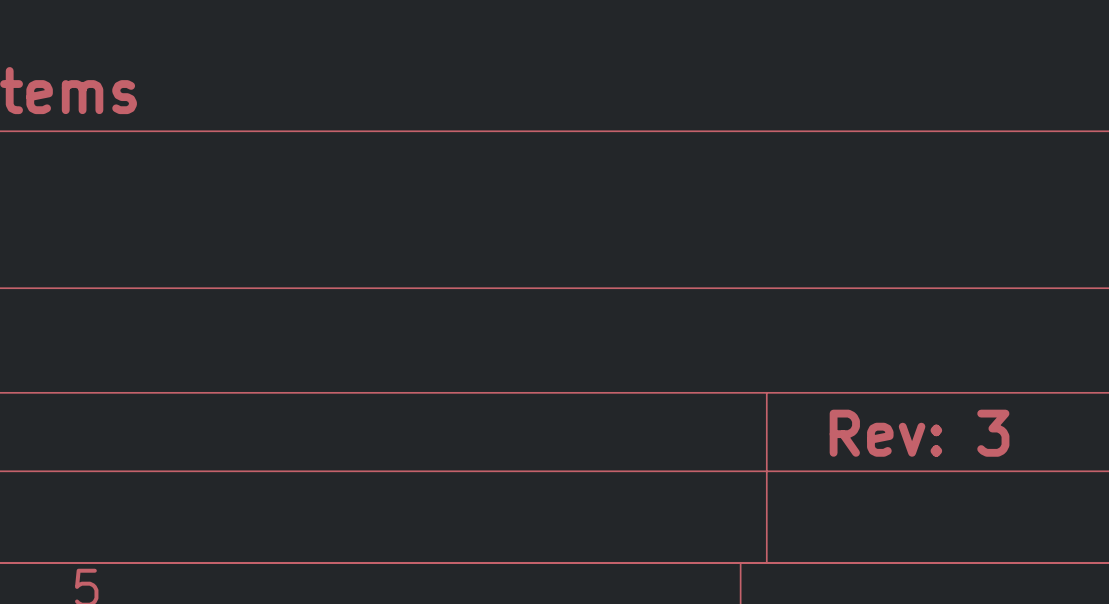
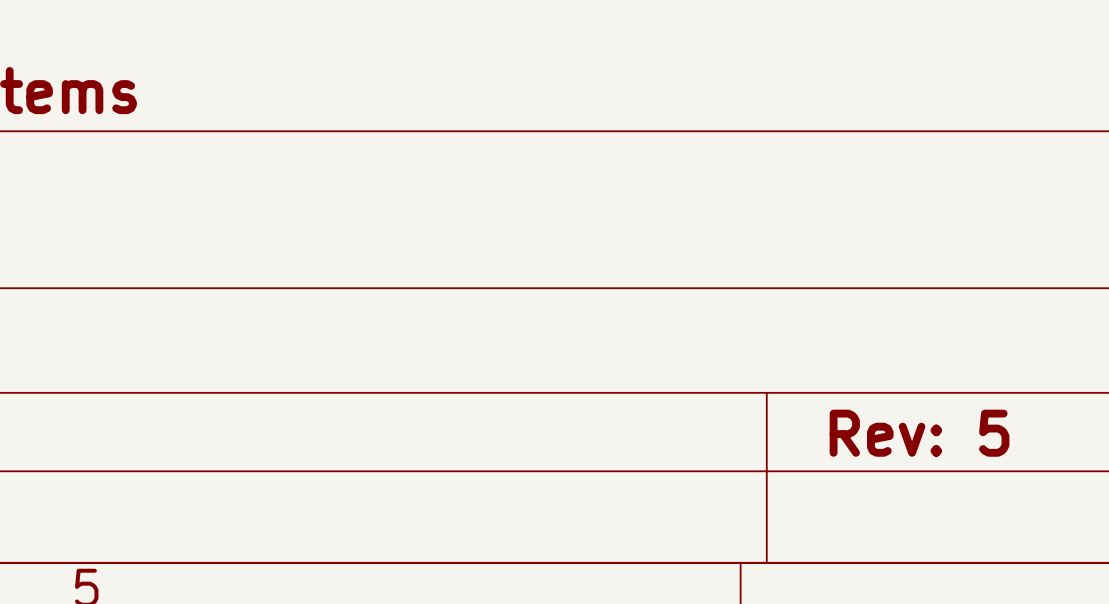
title block: Rev: 3 (919, 433) -> Rev: 5 (919, 433)

